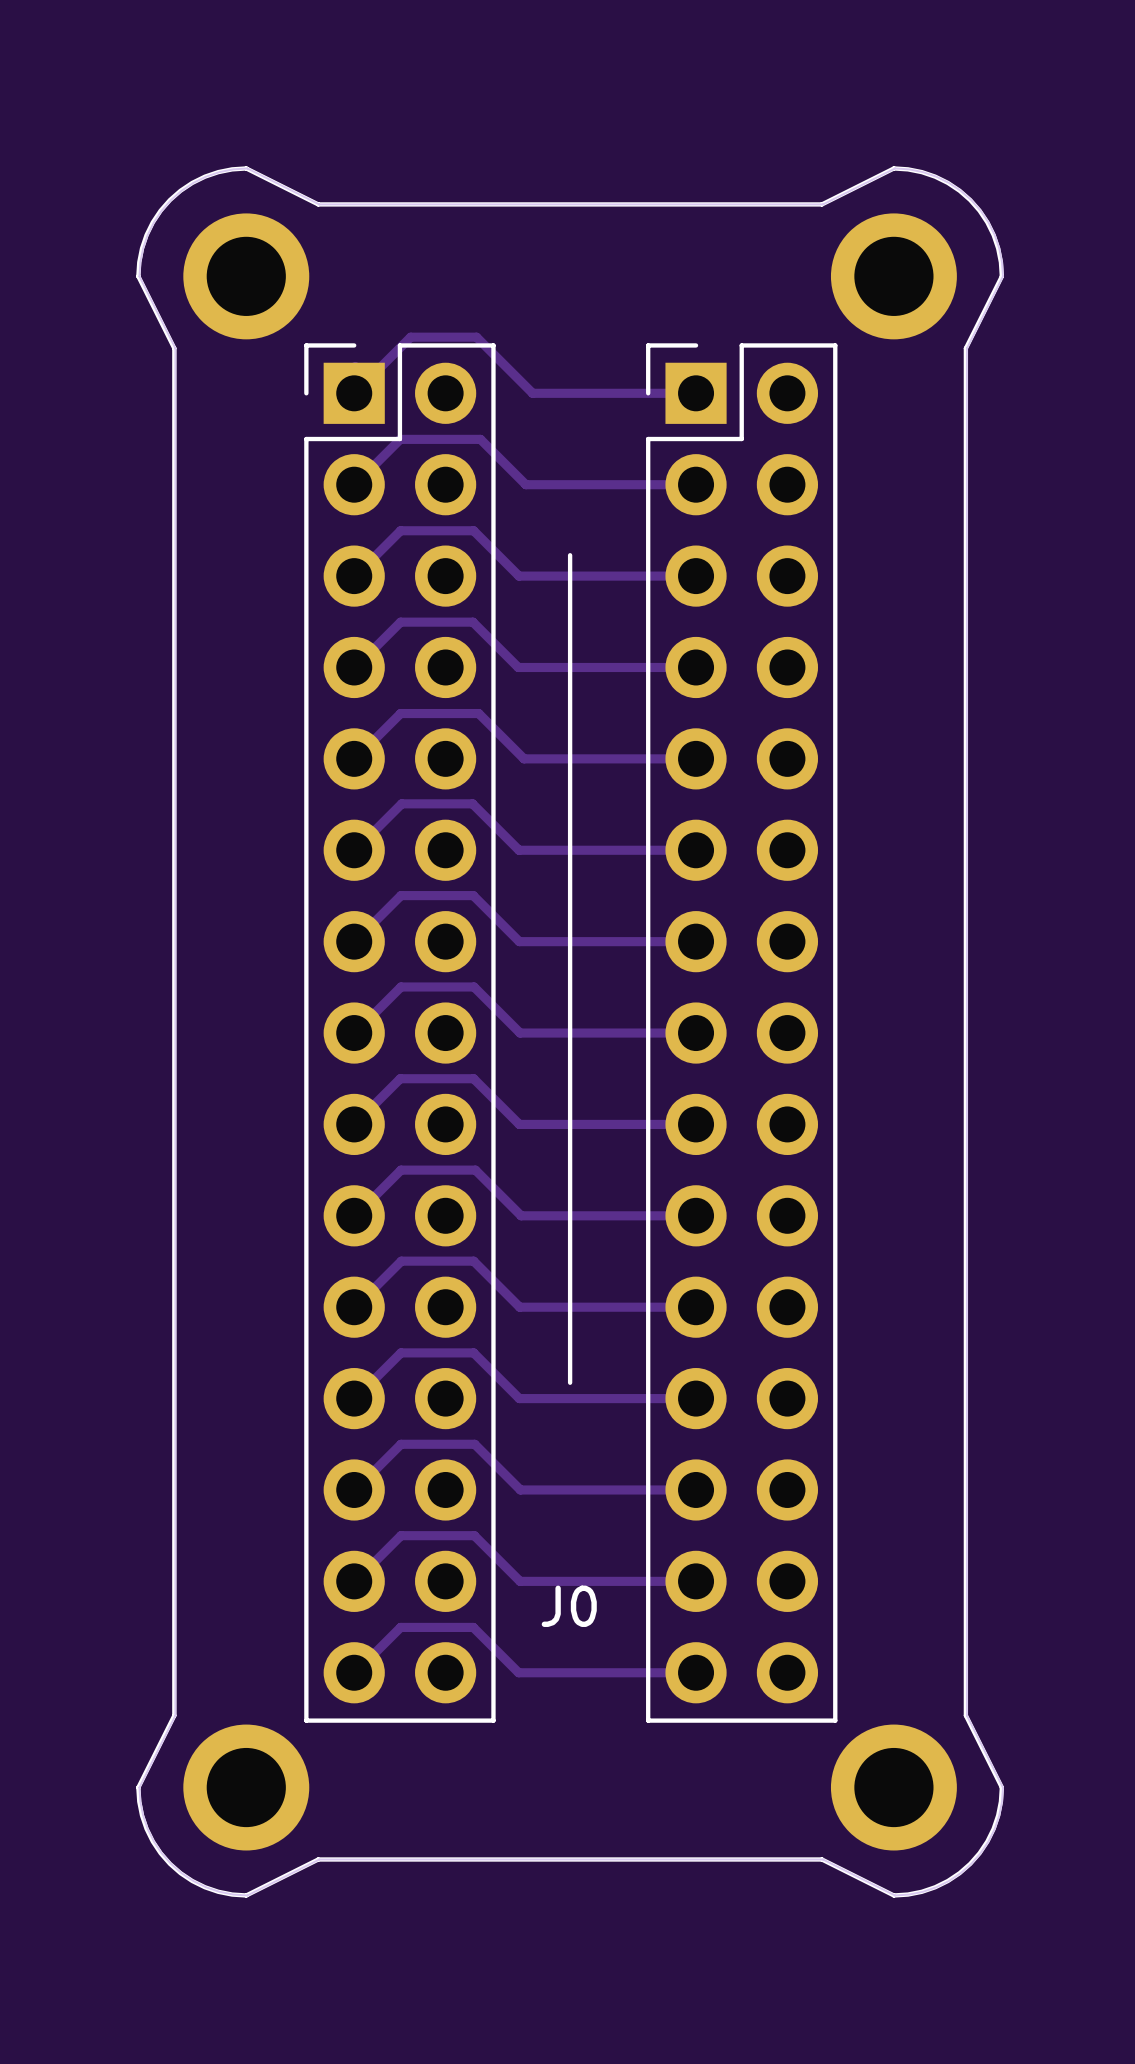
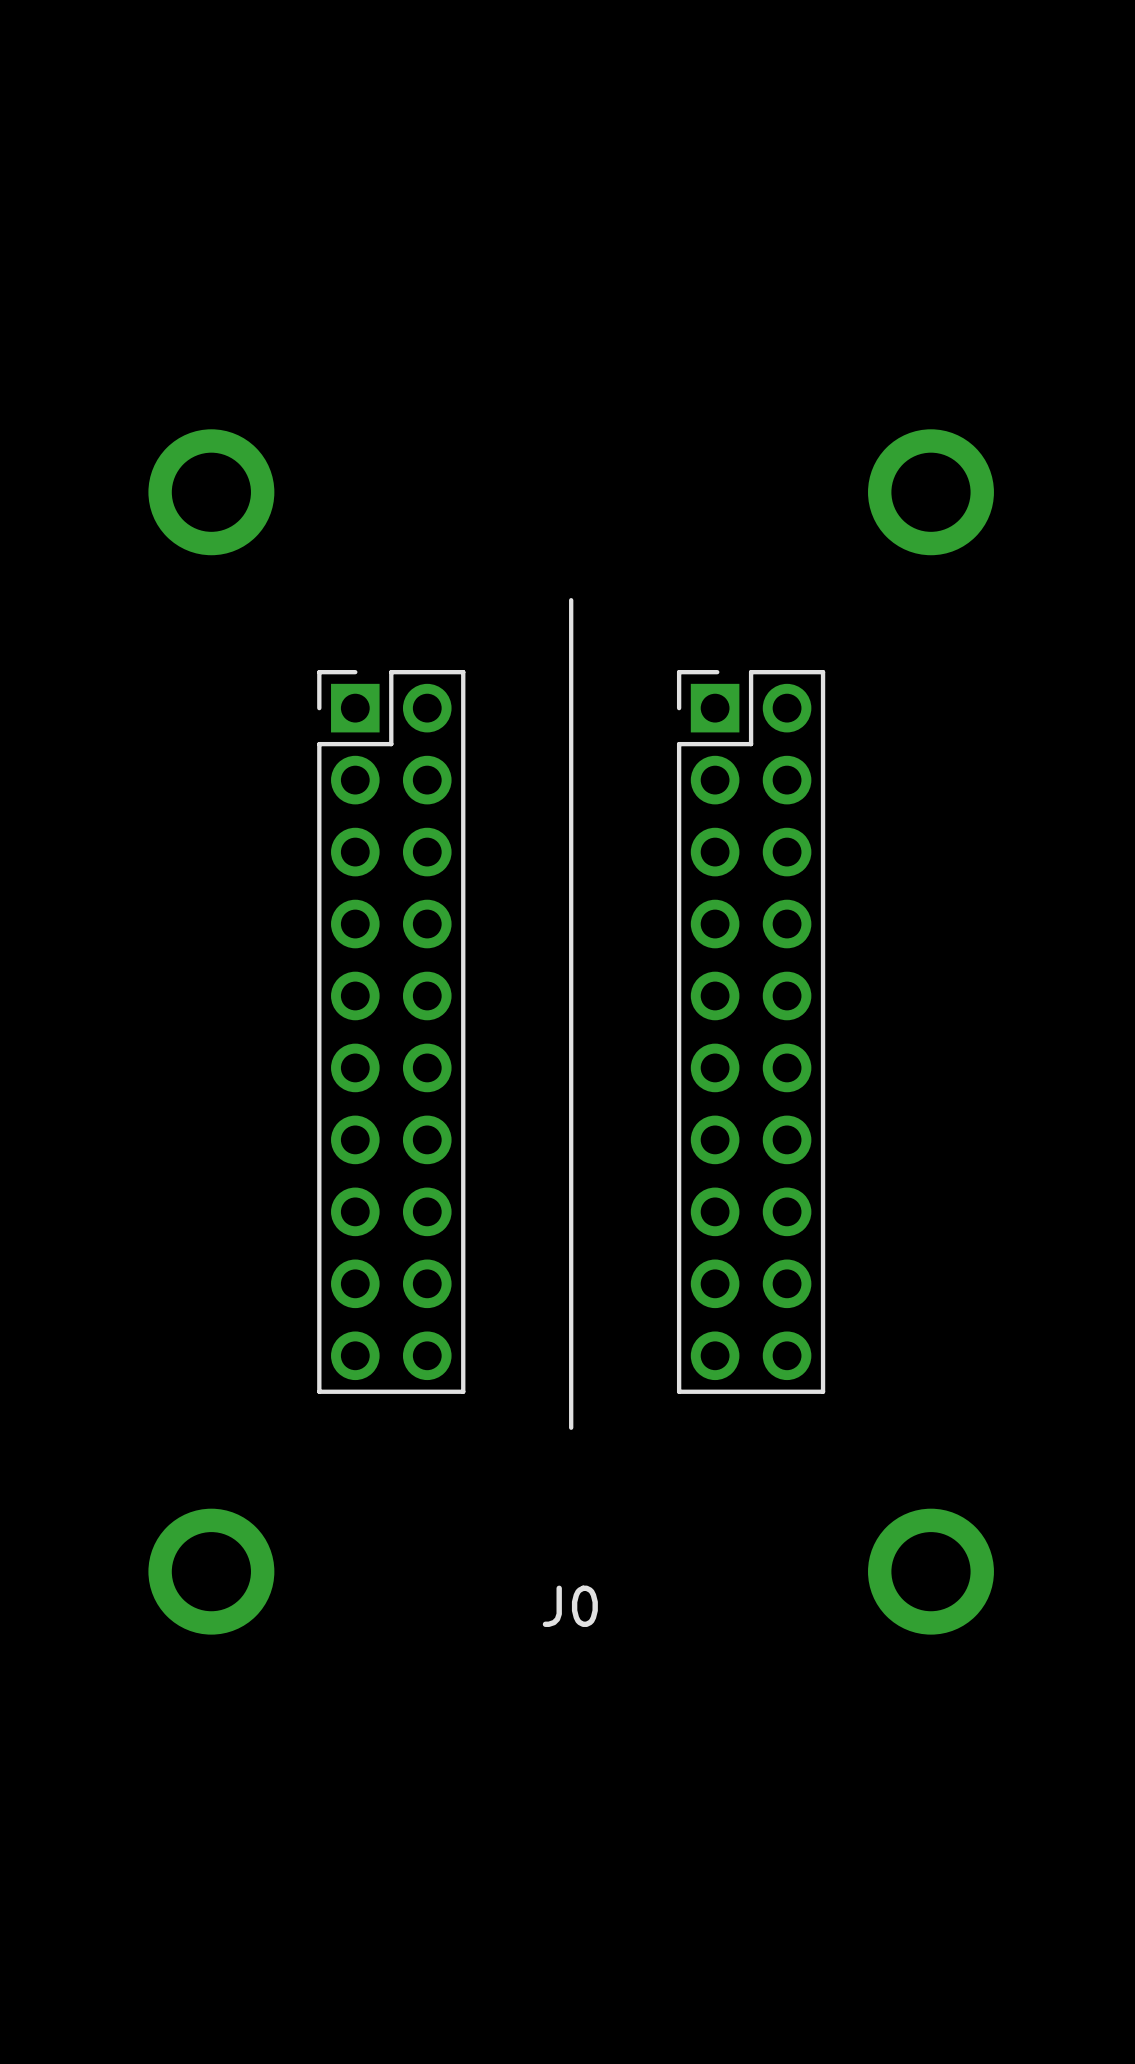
J0 footprint: [136, 166, 1005, 1898] -> [148, 429, 994, 1635]
board edge: (247, 168) (319, 204) (823, 204) (895, 168) (909, 169) (936, 176) (960, 190) (980, 210) (994, 235) (1002, 262) (1002, 276) (966, 348) (966, 1715) (1002, 1787) (1002, 1801) (994, 1828) (980, 1853) (960, 1873) (936, 1887) (909, 1894) (895, 1895) (823, 1859) (319, 1859) (247, 1895) (233, 1894) (206, 1887) (181, 1873) (161, 1853) (147, 1828) (140, 1801) (139, 1787) (175, 1715) (175, 348) (139, 276) (140, 262) (147, 235) (153, 222) (171, 200) (193, 182) (206, 176) (219, 172) (247, 168) -> none
track: (354, 392) (410, 337) (476, 337) (532, 393) (697, 393) -> none
track: (697, 484) (525, 484) (480, 439) (400, 439) (354, 485) -> none
track: (355, 576) (400, 530) (473, 530) (519, 576) (697, 576) -> none
track: (355, 667) (400, 622) (472, 622) (518, 667) (697, 667) -> none
track: (355, 758) (400, 713) (478, 713) (524, 758) (697, 758) -> none
track: (355, 850) (401, 803) (472, 803) (519, 850) (697, 850) -> none
track: (354, 941) (401, 895) (473, 895) (519, 941) (697, 941) -> none
track: (355, 1032) (401, 986) (474, 986) (520, 1033) (697, 1033) -> none
track: (354, 1124) (400, 1078) (473, 1078) (519, 1124) (697, 1124) -> none
track: (355, 1215) (401, 1170) (475, 1170) (521, 1215) (697, 1215) -> none
track: (355, 1307) (401, 1261) (473, 1261) (519, 1307) (697, 1307) -> none
track: (355, 1398) (401, 1352) (473, 1352) (519, 1398) (697, 1398) -> none
track: (355, 1489) (401, 1444) (474, 1444) (520, 1489) (697, 1489) -> none
track: (355, 1581) (401, 1535) (474, 1535) (520, 1581) (697, 1581) -> none
track: (355, 1672) (400, 1627) (473, 1627) (518, 1672) (697, 1672) -> none

